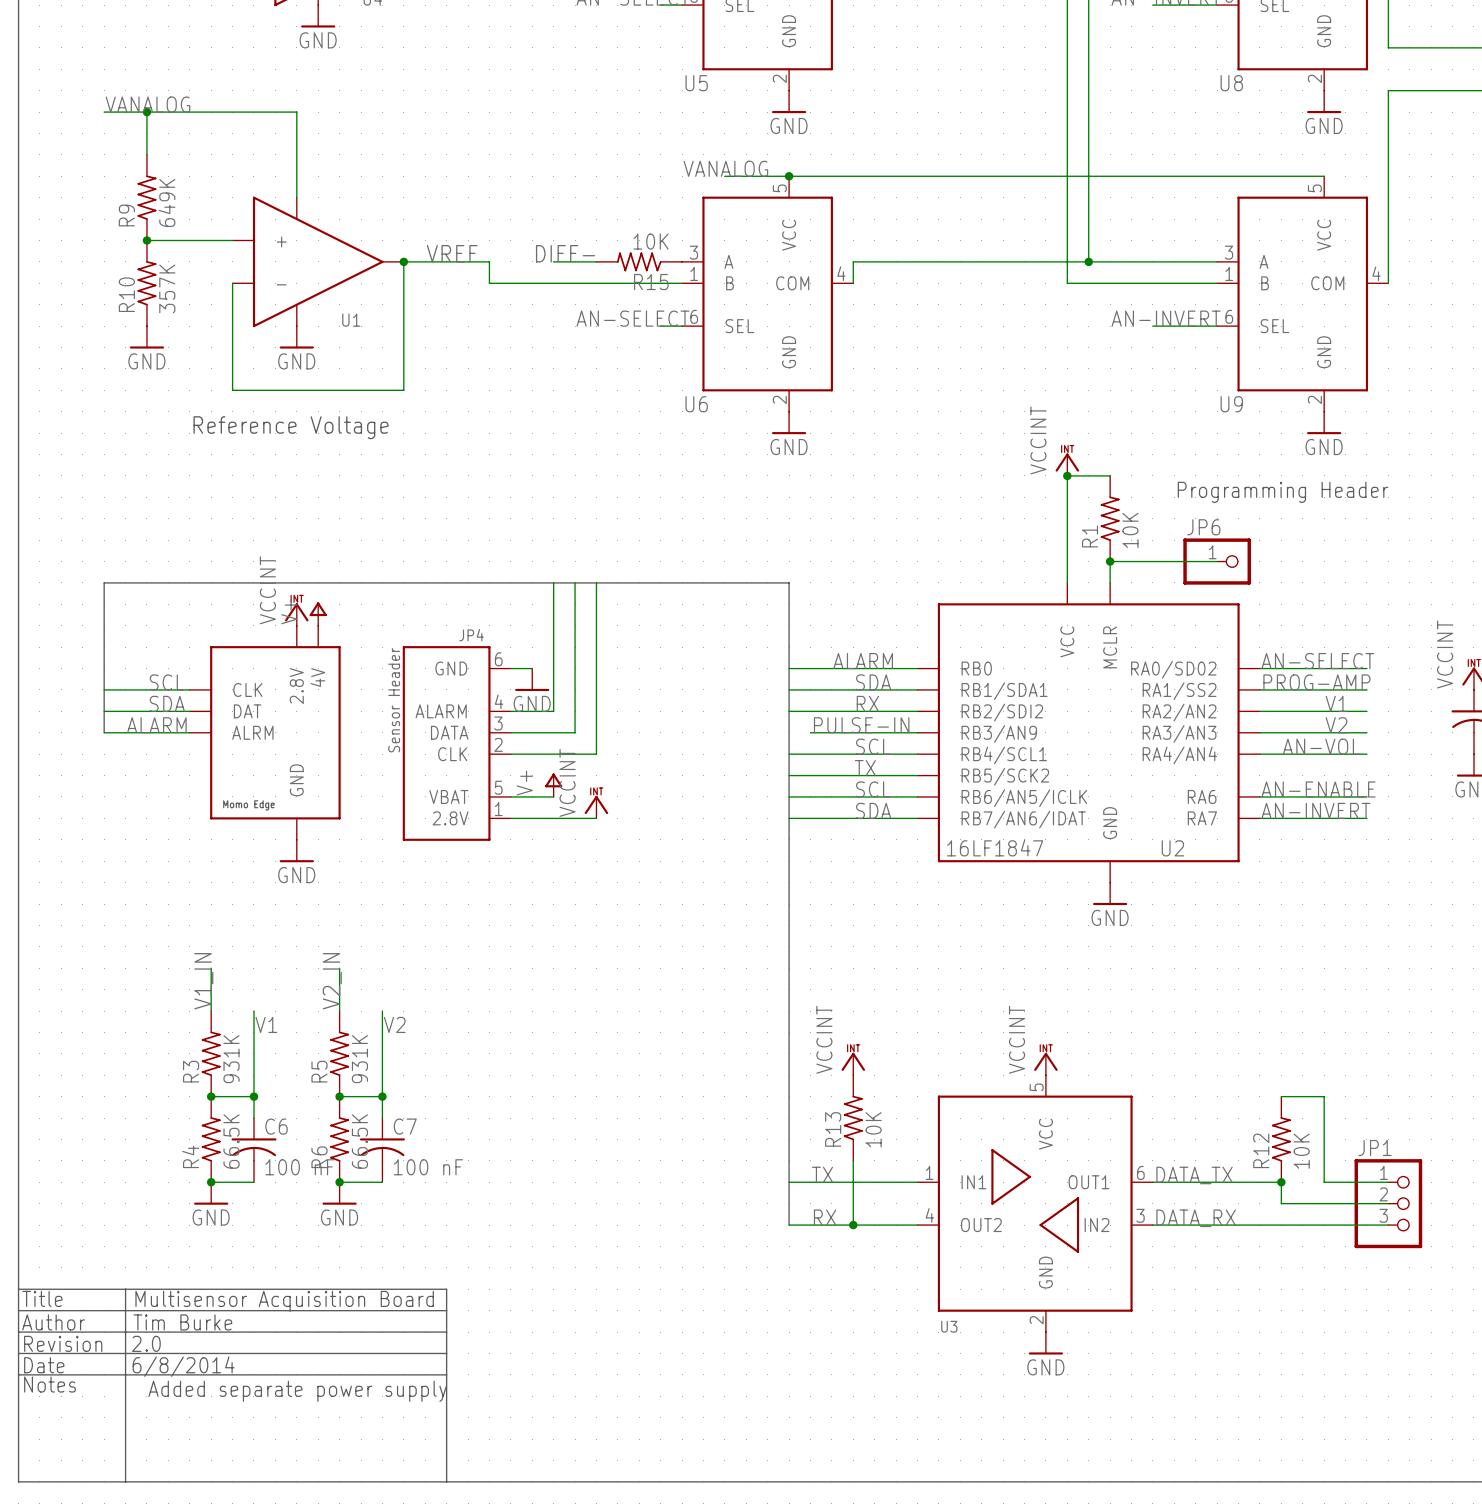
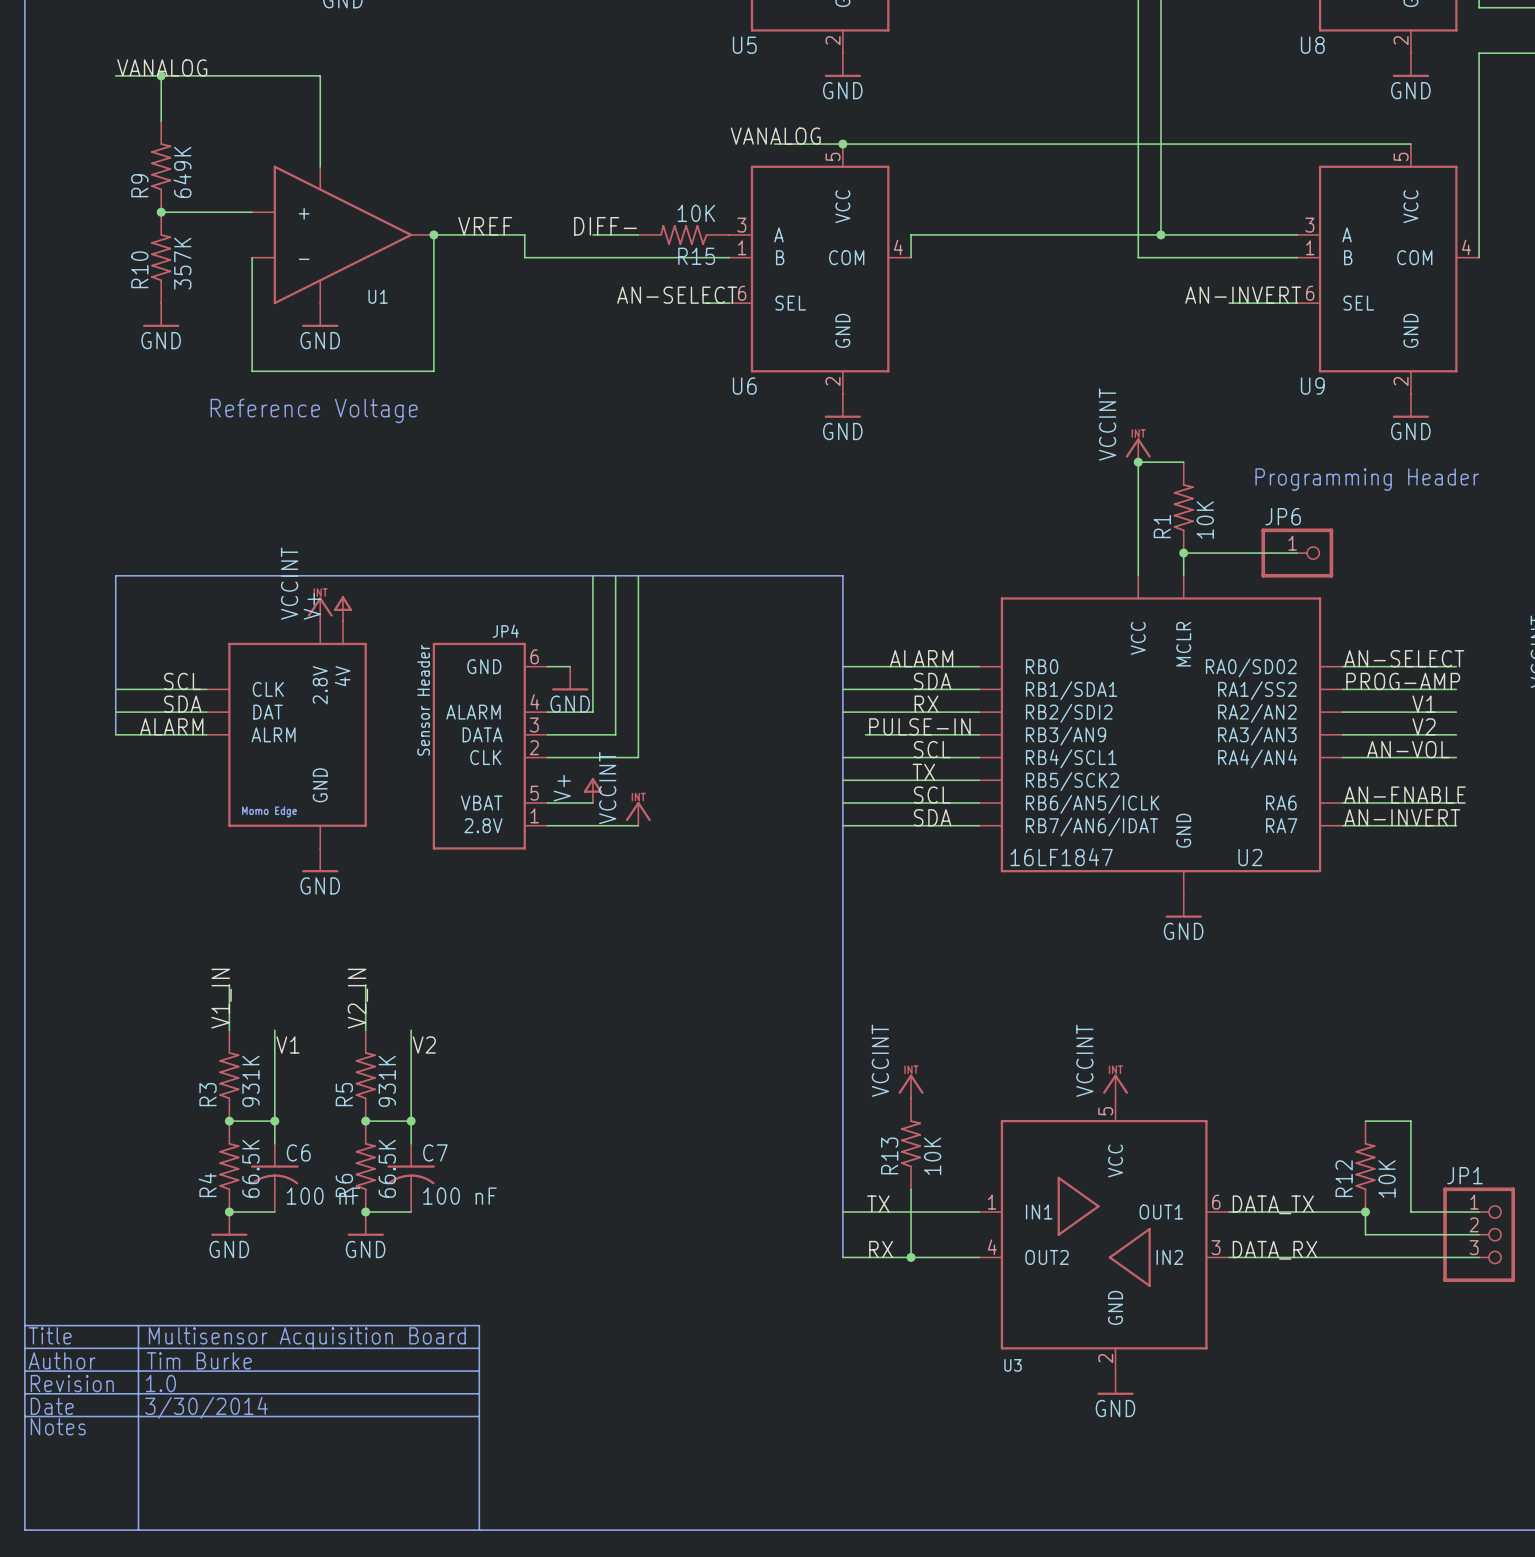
text: 2.0 (146, 1343) -> 1.0 (160, 1383)
text: 6/8/2014 (183, 1366) -> 3/30/2014 (206, 1407)
text: Added separate power supply (297, 1391) -> none

